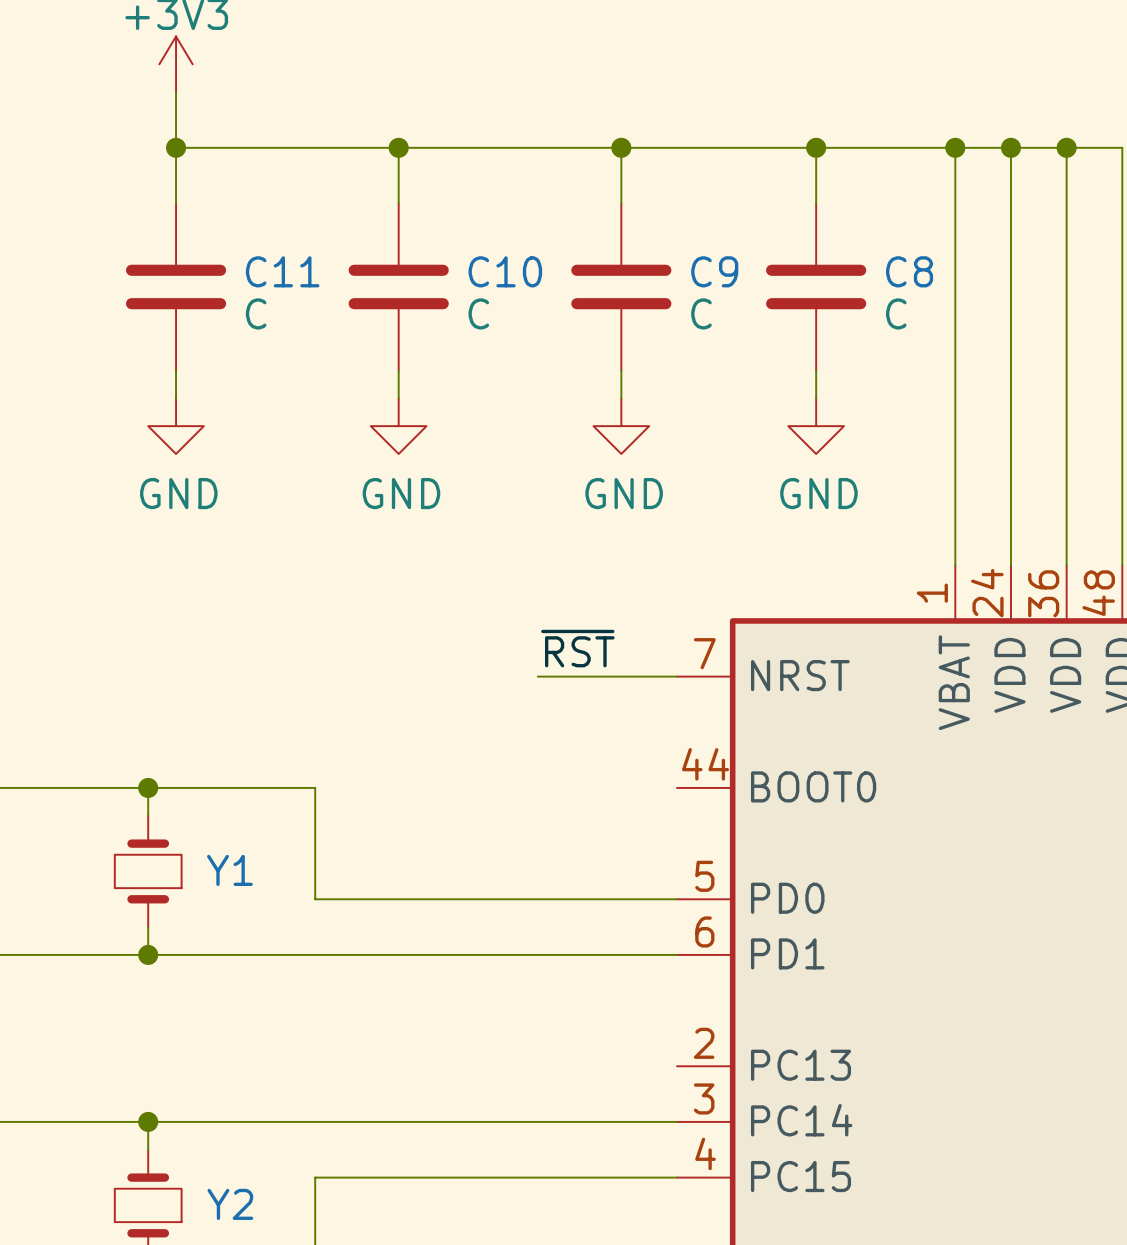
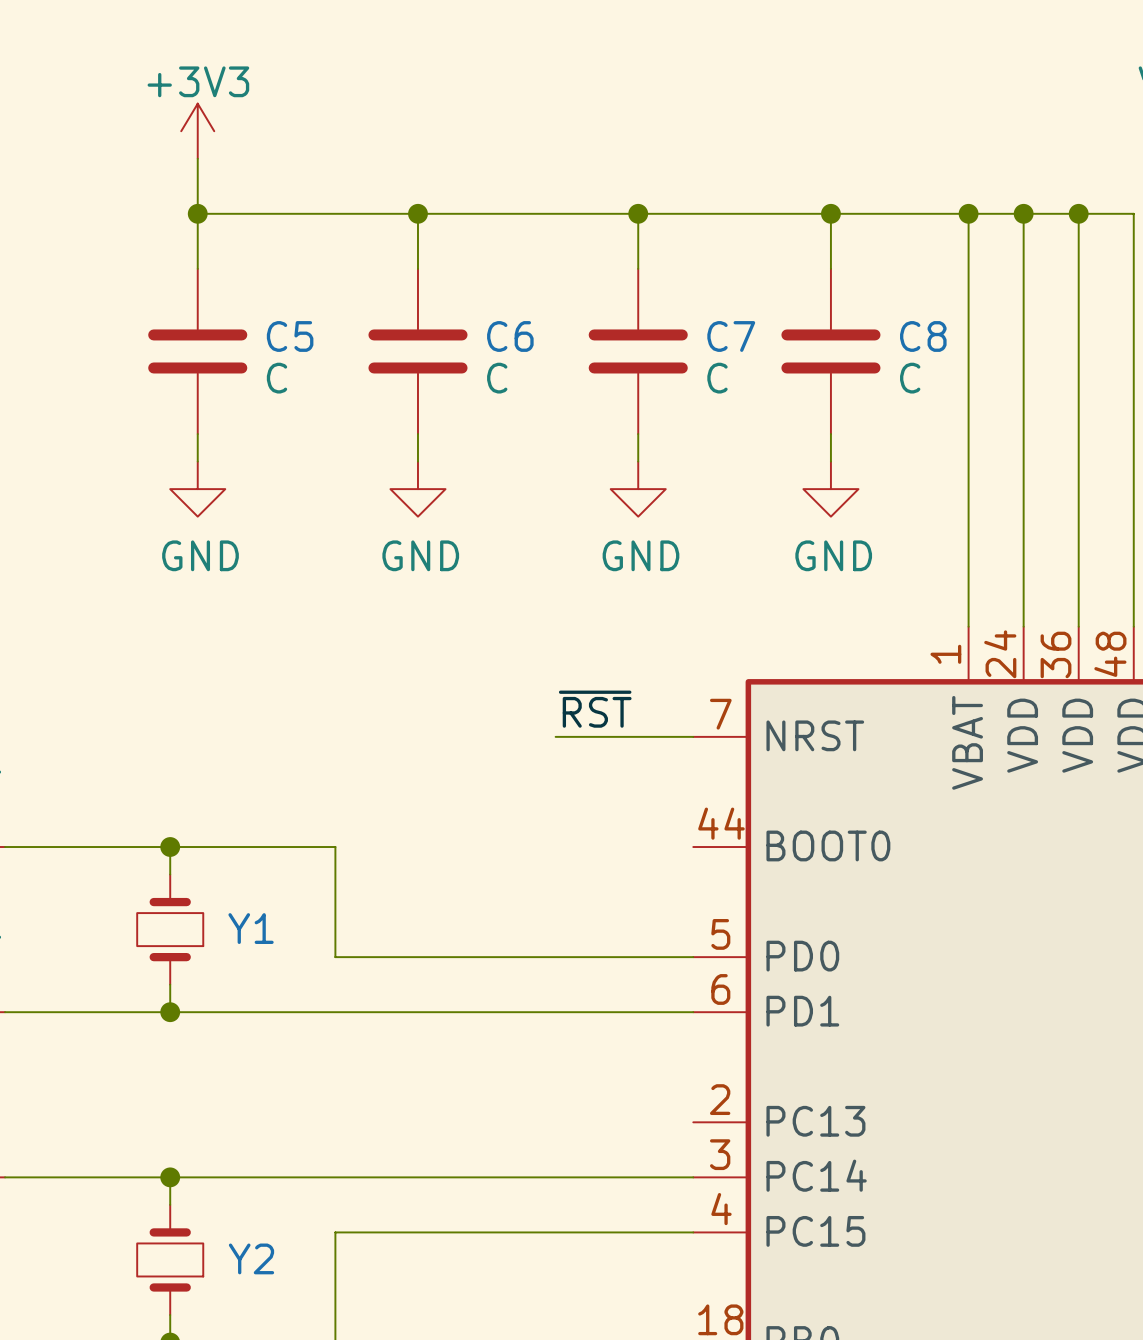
C11 name: C11 (282, 271) -> C5 (290, 336)
C10 name: C10 (505, 271) -> C6 (510, 336)
C9 name: C9 (714, 271) -> C7 (731, 336)

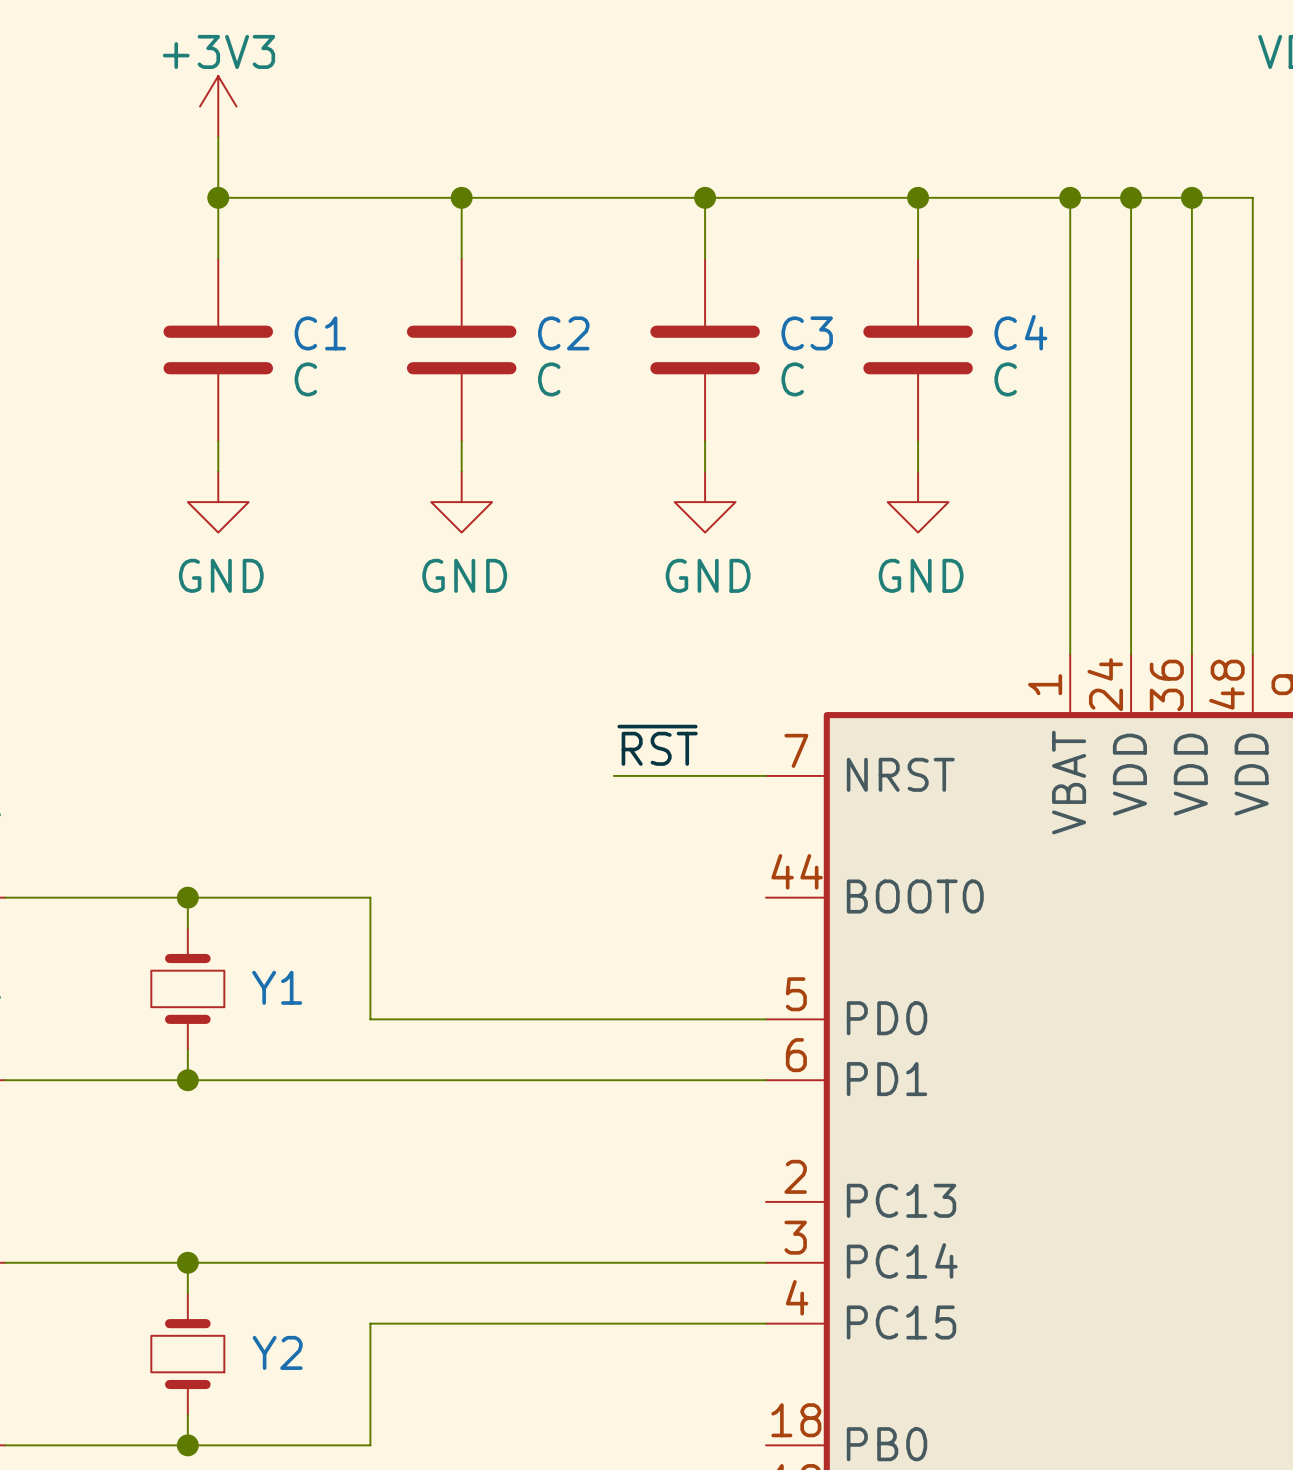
C5 name: C5 (290, 336) -> C1 (320, 333)
C6 name: C6 (510, 336) -> C2 (563, 333)
C7 name: C7 (731, 336) -> C3 (807, 333)
C8 name: C8 (923, 336) -> C4 (1020, 332)

